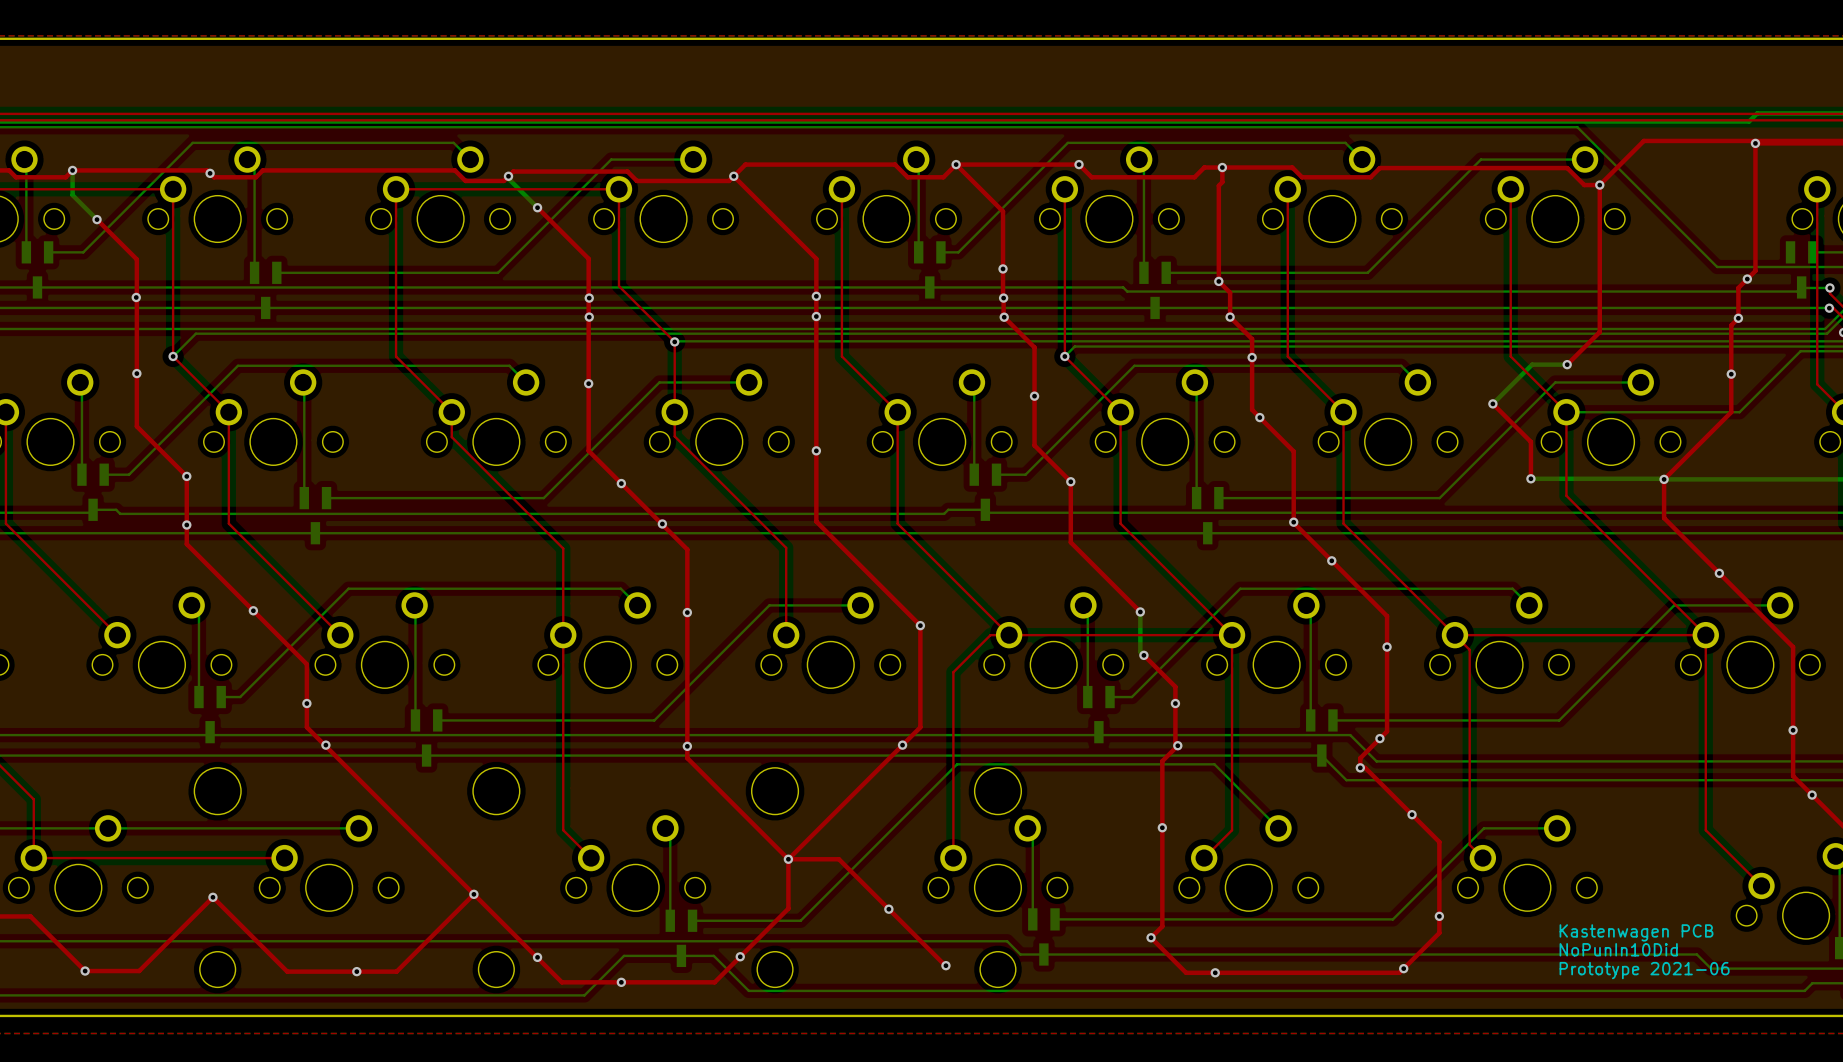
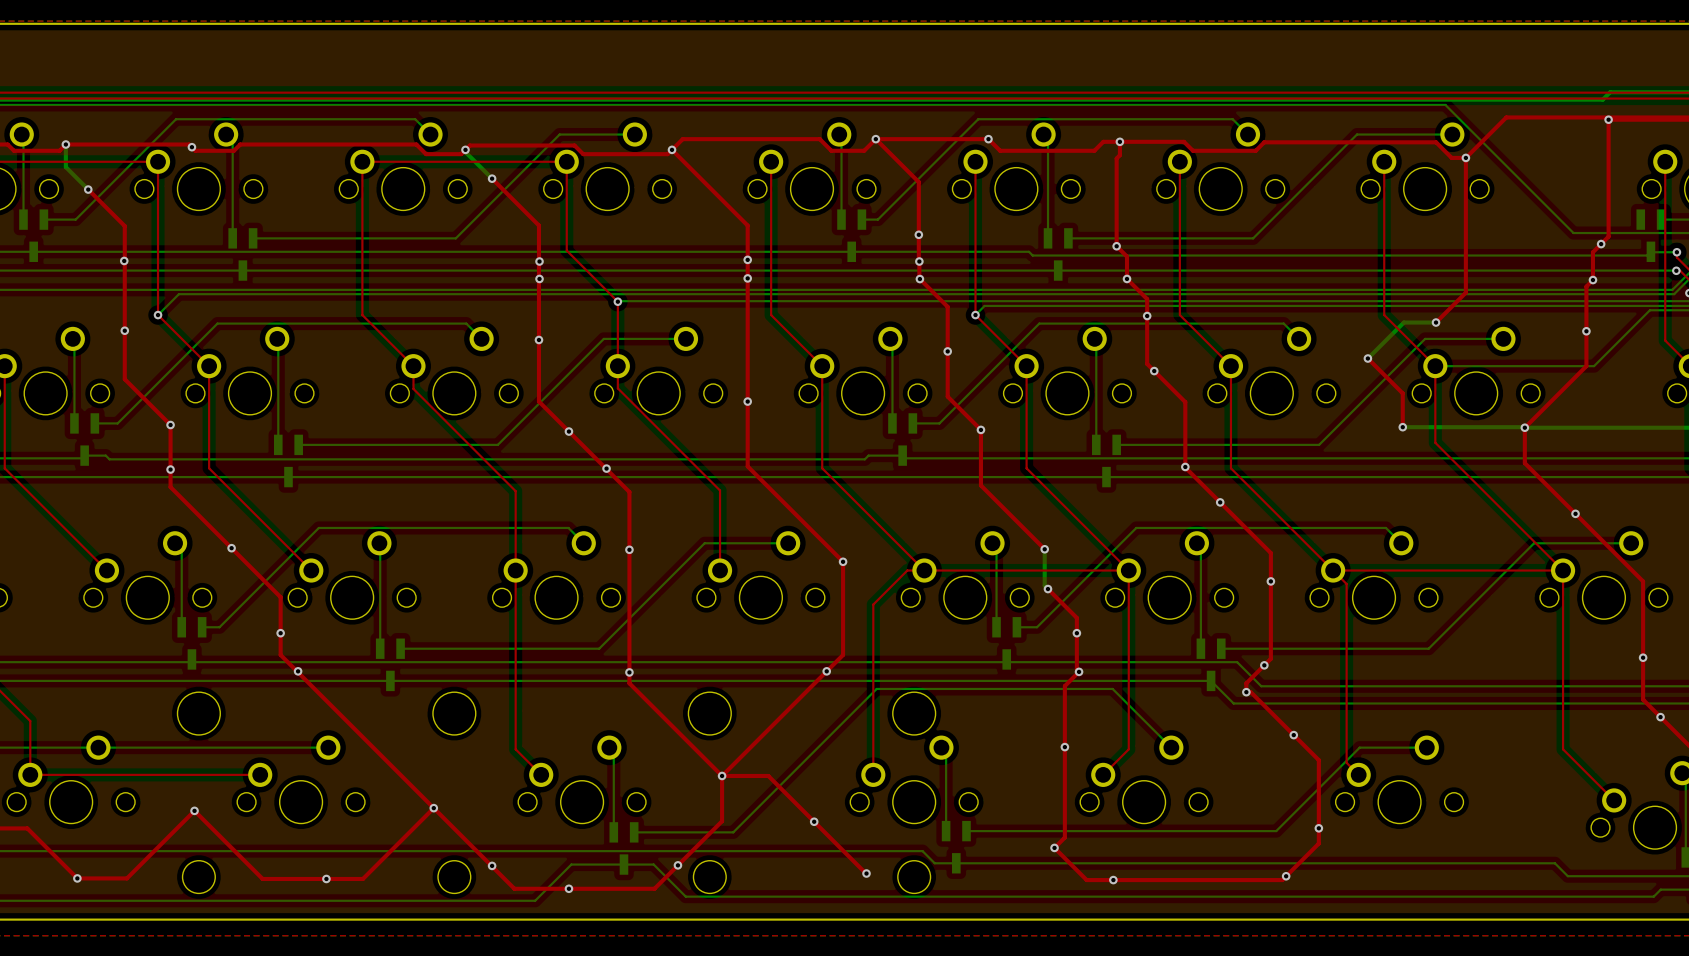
text: Kastenwagen PCB (1636, 932) -> none
text: NoPunIn10Did (1618, 949) -> none
text: Prototype 2021-06 (1644, 970) -> none

